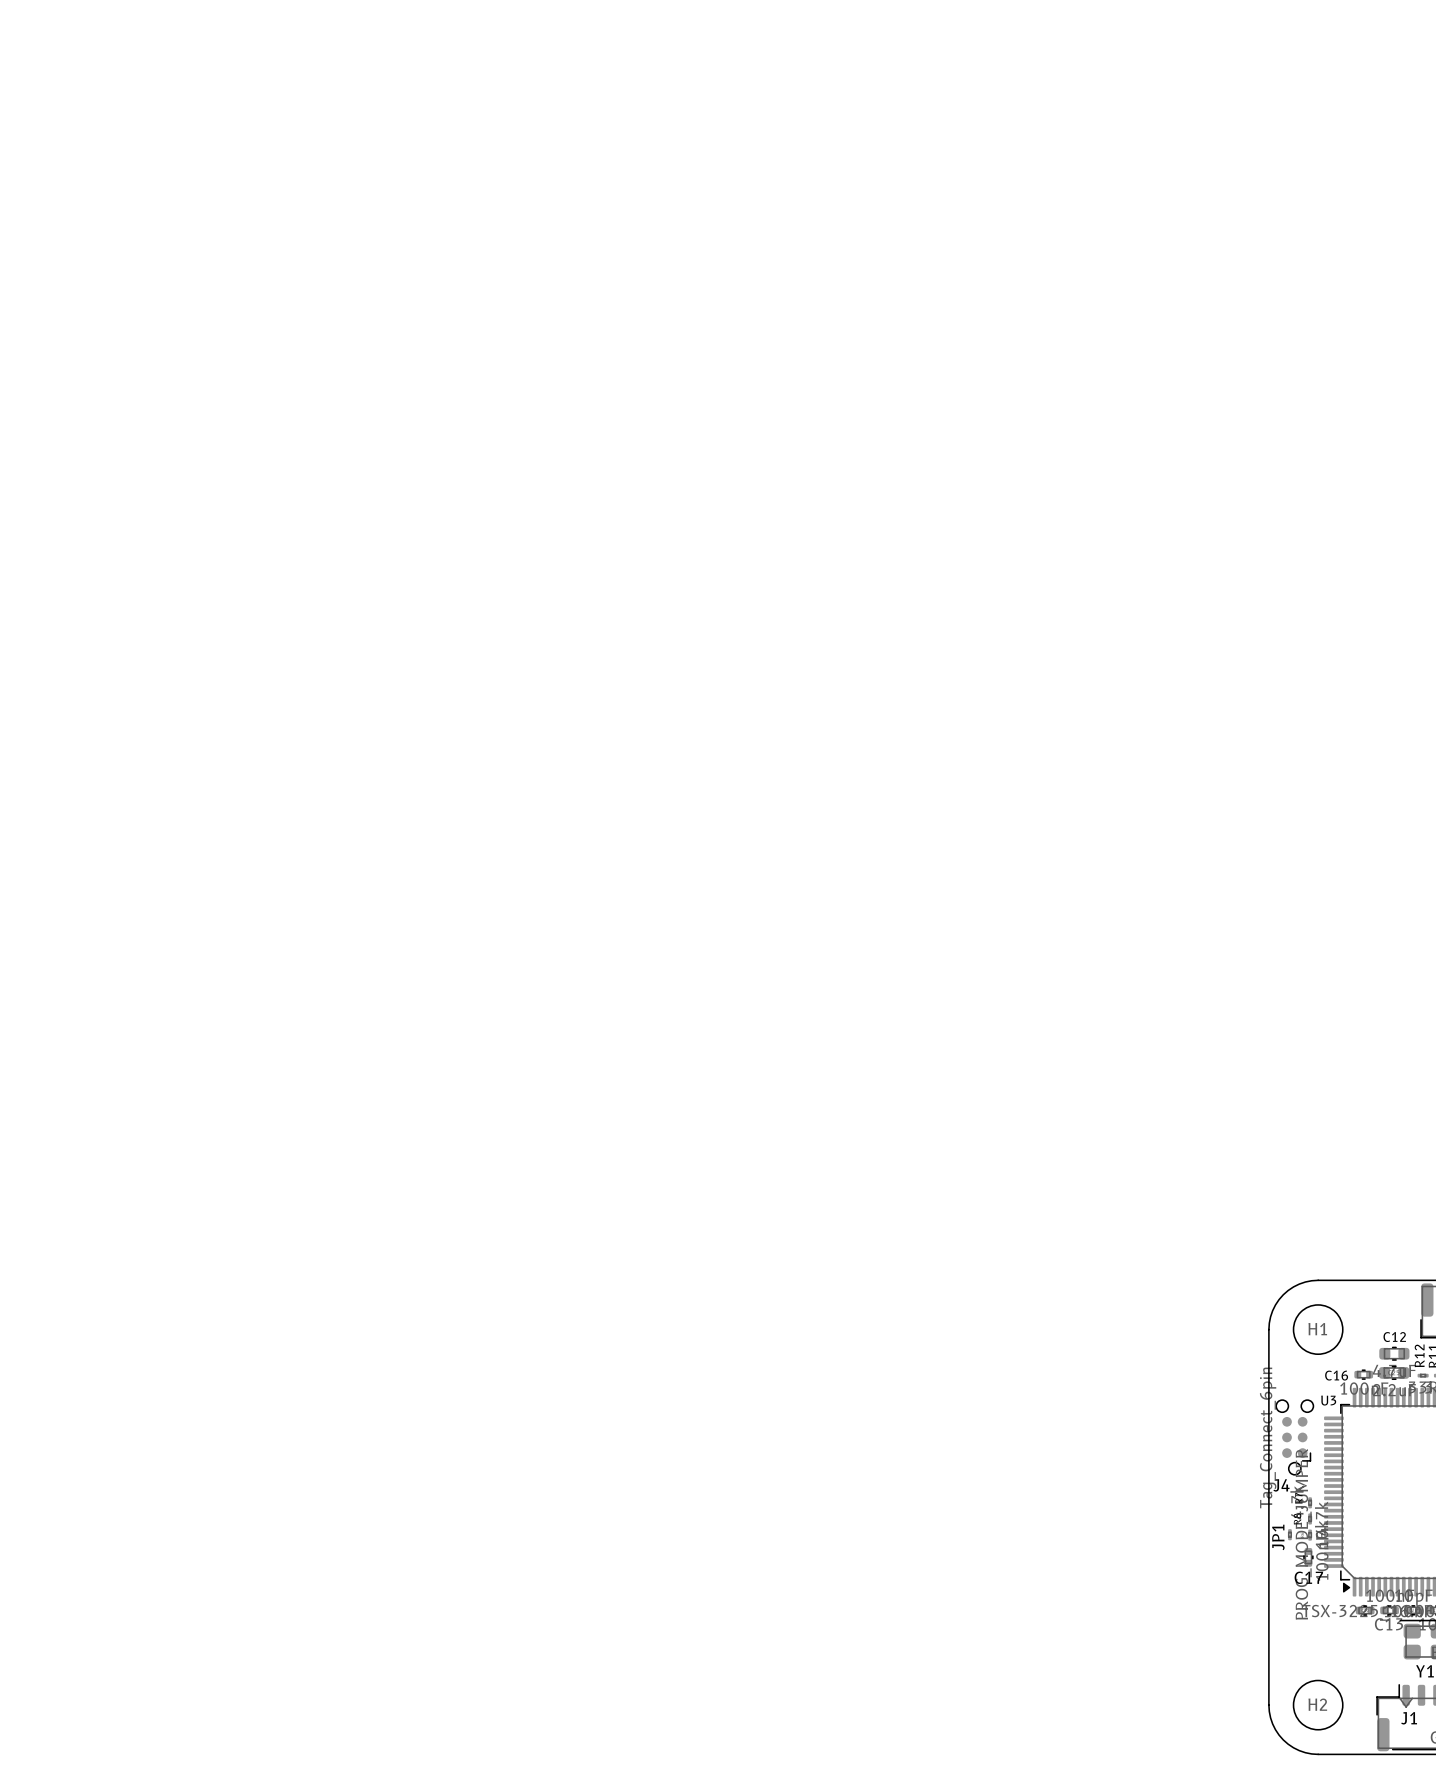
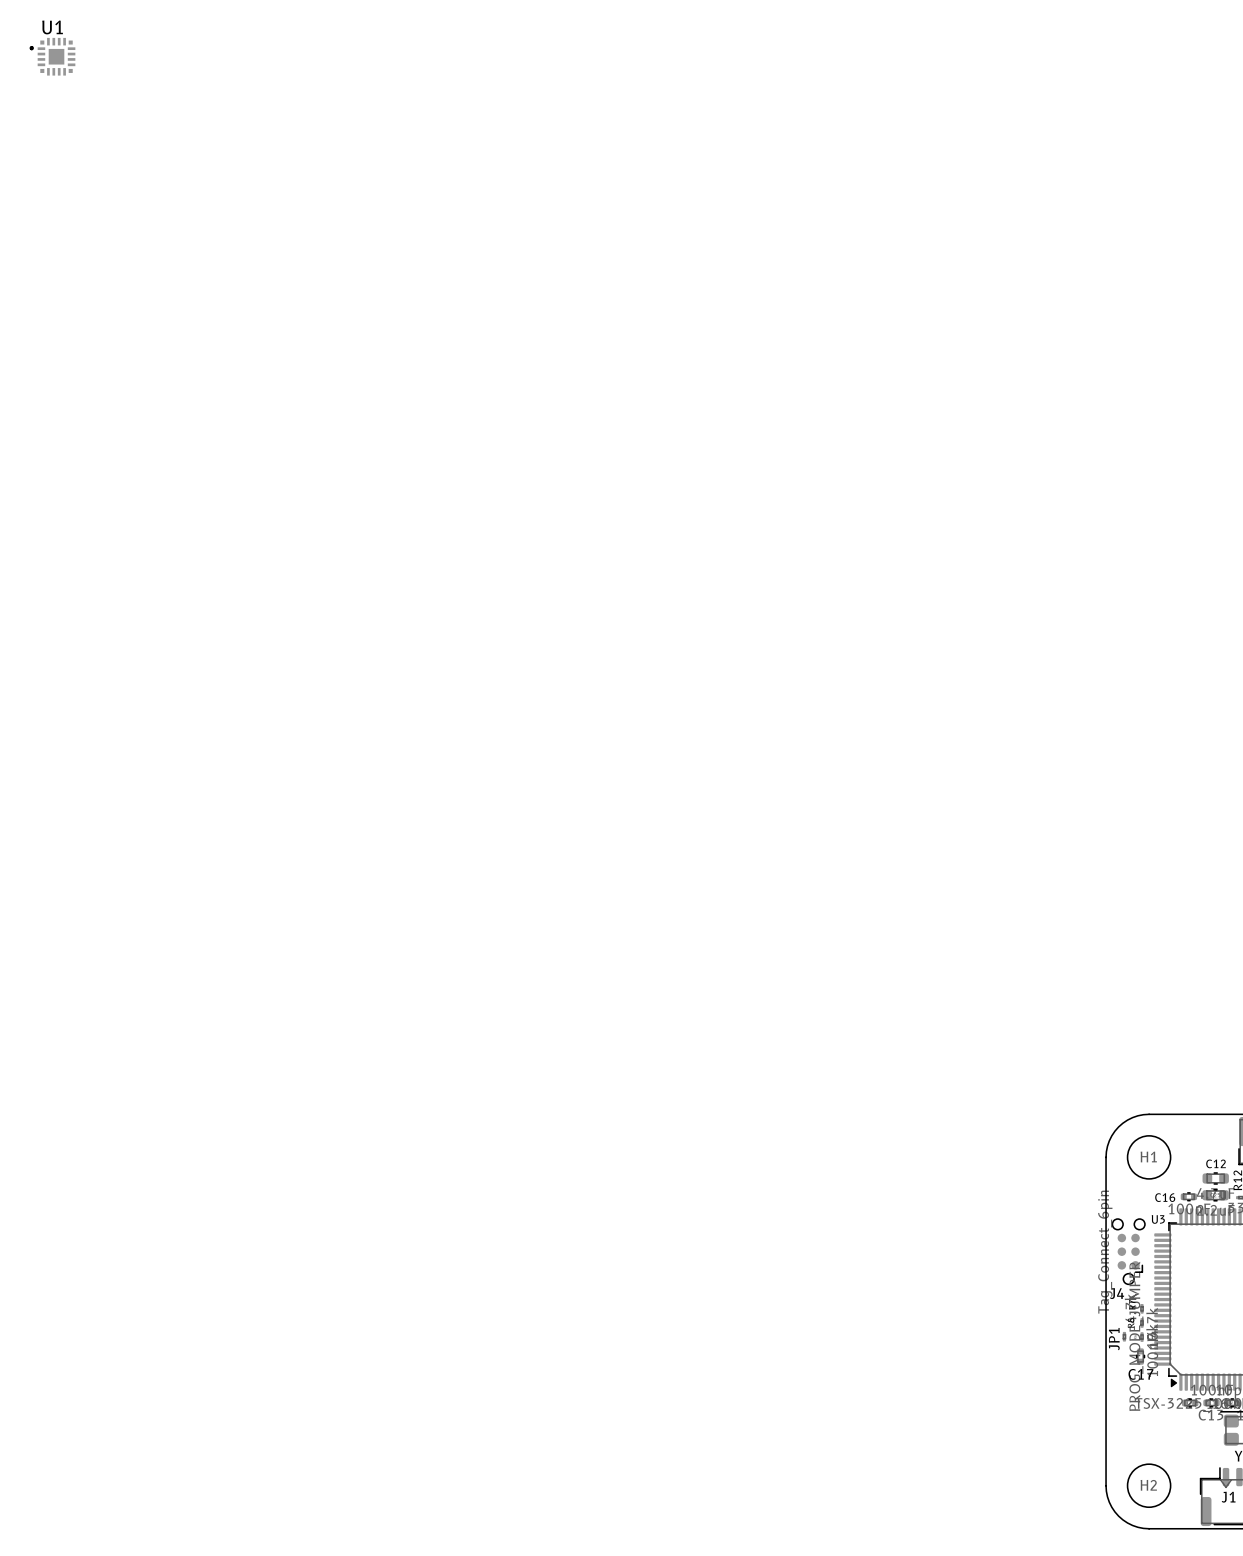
U1: none -> (52, 56)

